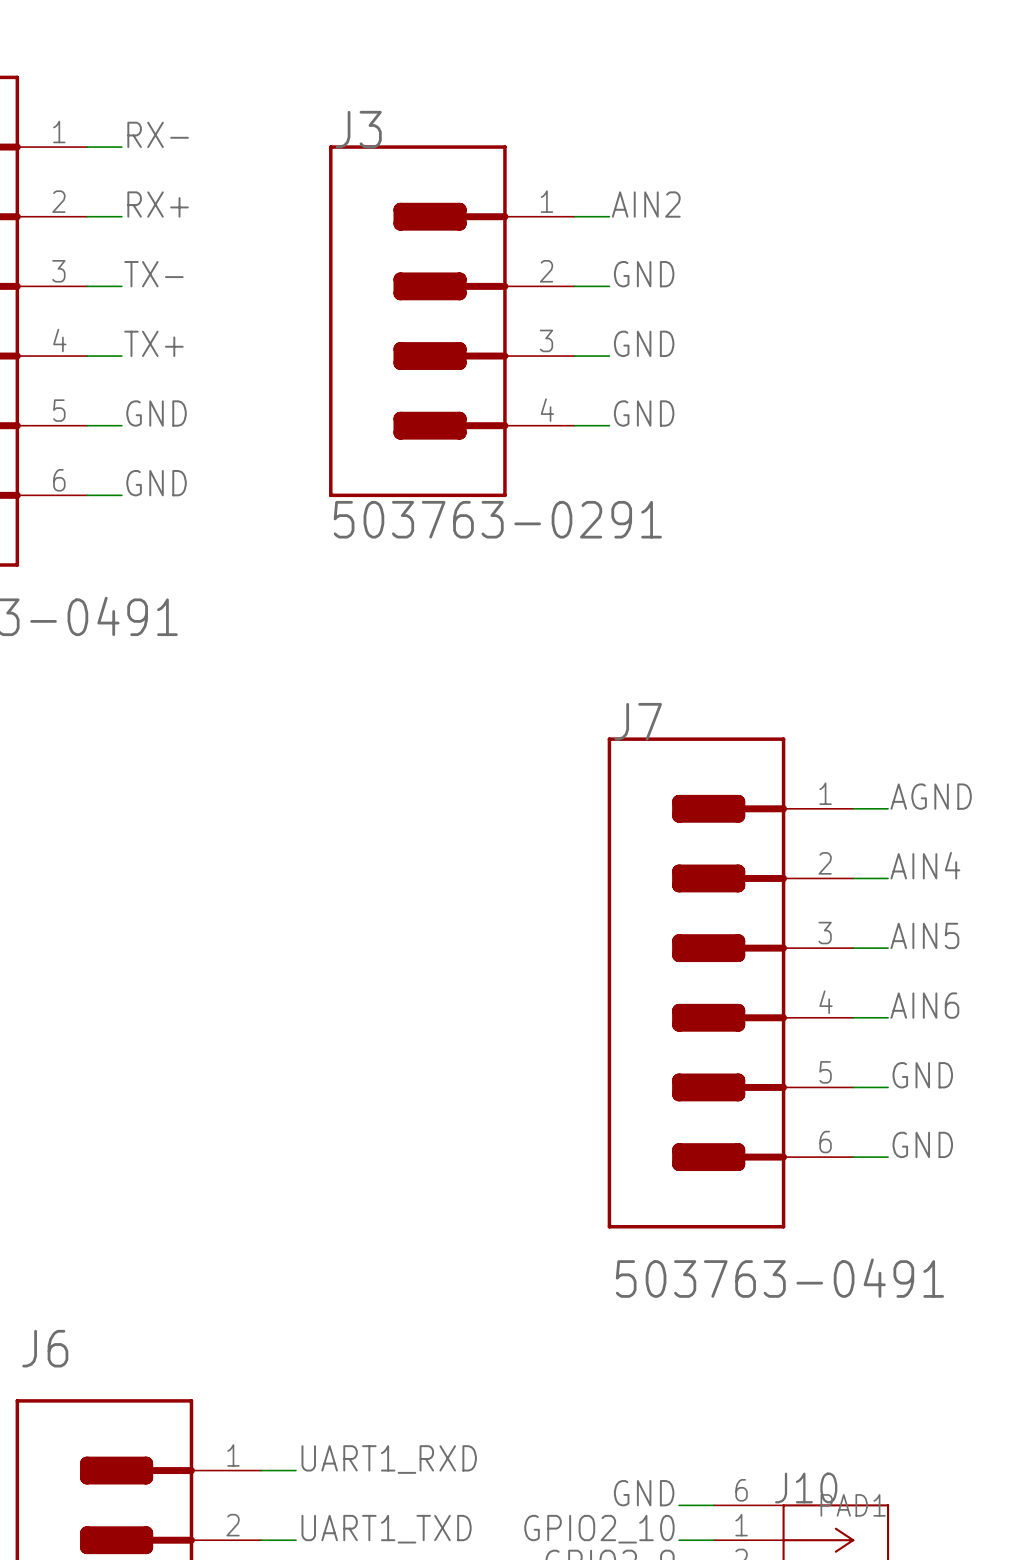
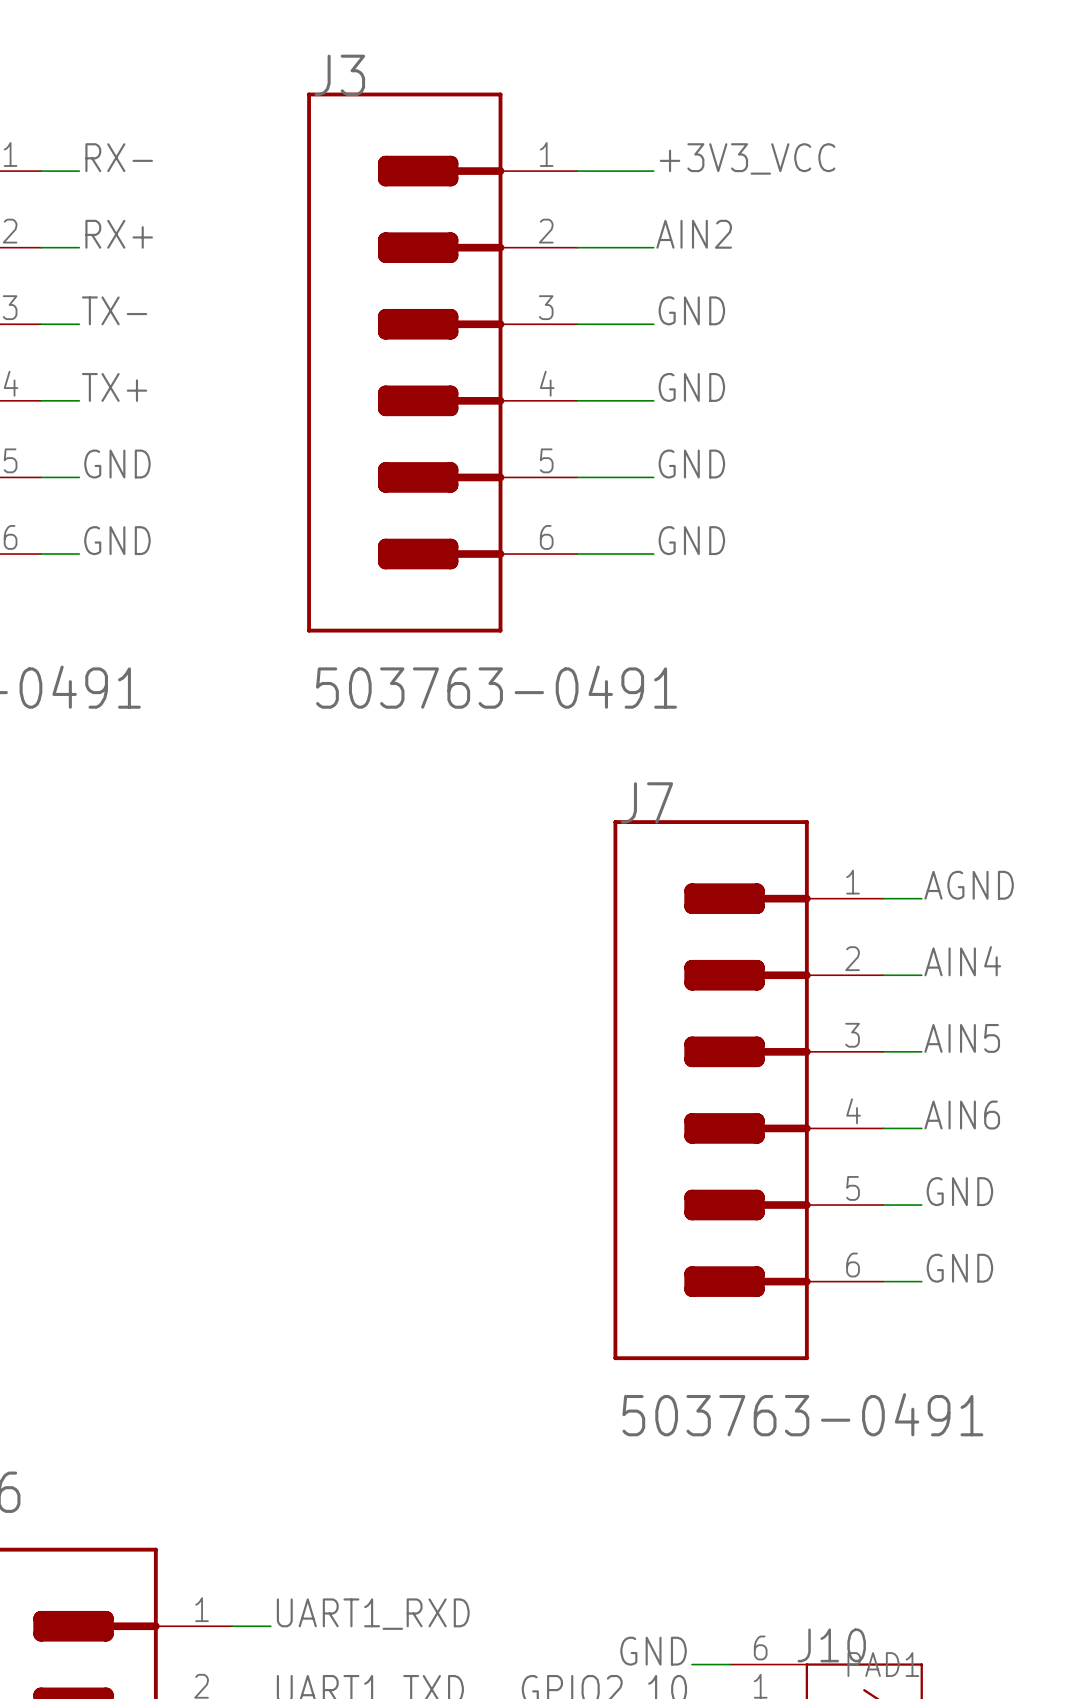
J3 name position: J3 (358, 129) -> J3 (339, 75)
label: none -> +3V3_VCC (747, 158)
J3 symbol: [329, 145, 575, 498] -> [307, 92, 578, 633]
wire: none -> (577, 171) (653, 171)
label position: AIN2 (646, 204) -> AIN2 (694, 234)
wire: none -> (615, 247) (653, 247)
label position: GND (644, 274) -> GND (691, 310)
wire: none -> (615, 324) (653, 324)
label position: GND (644, 343) -> GND (691, 387)
wire: none -> (615, 400) (653, 400)
label position: GND (644, 413) -> GND (691, 464)
wire: none -> (615, 477) (653, 477)
label: none -> GND (691, 540)
wire: none -> (577, 554) (653, 554)

